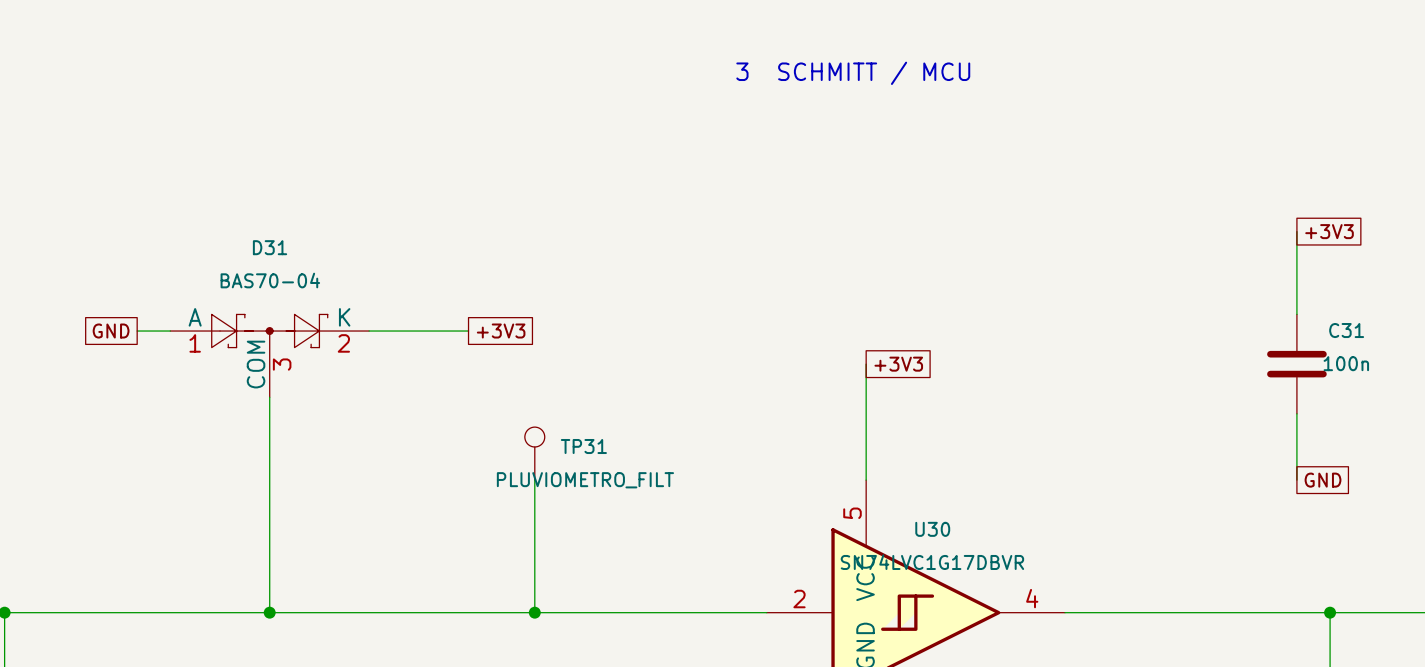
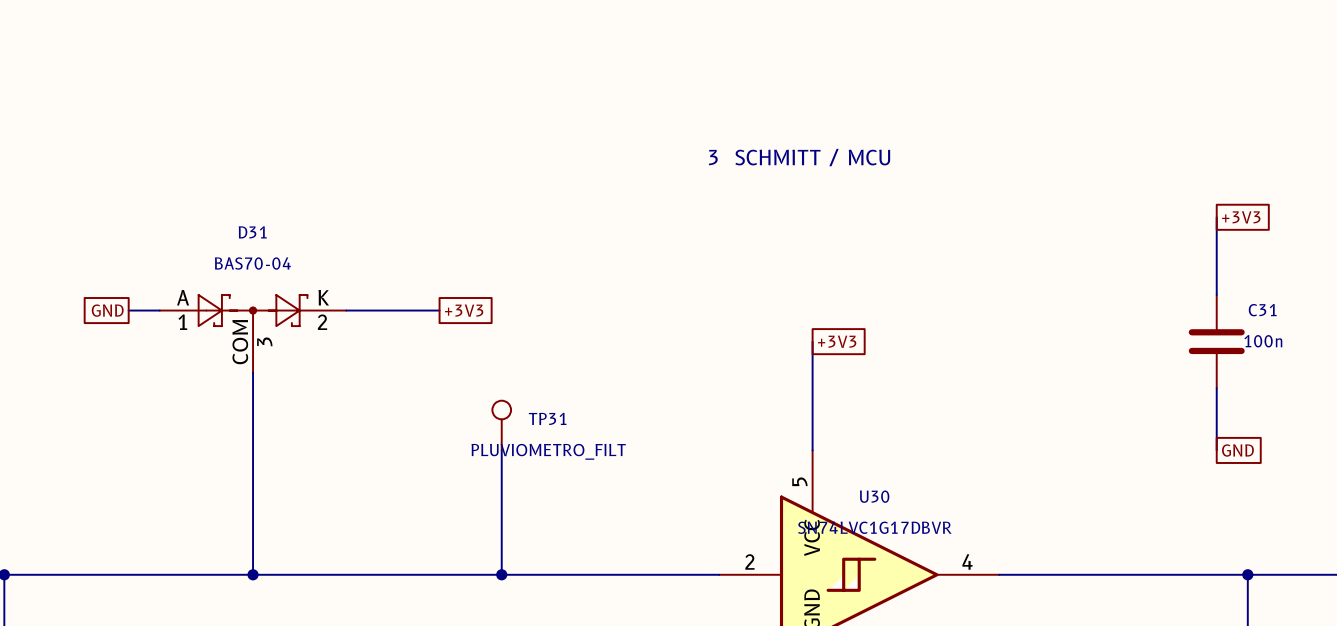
text position: 3 SCHMITT / MCU (853, 73) -> 3 SCHMITT / MCU (799, 157)

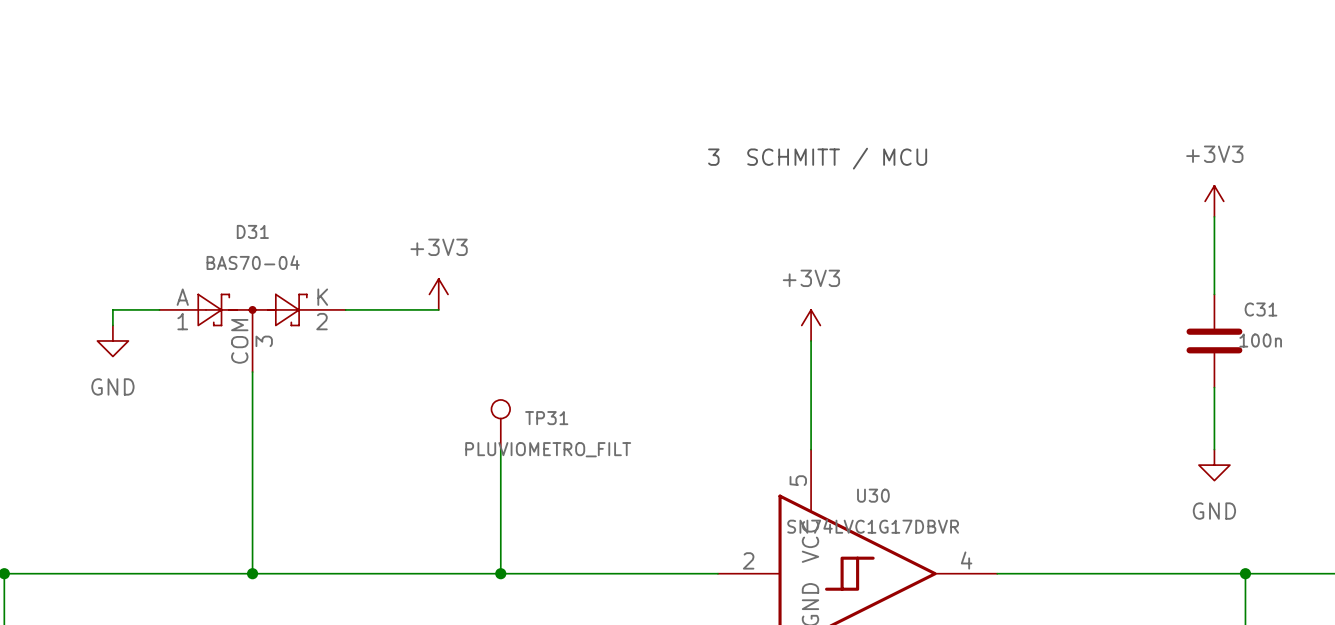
power symbol: none -> +3V3 (1214, 201)
global label: +3V3 (1241, 217) -> none
power symbol: none -> +3V3 (438, 294)
global label: GND (107, 310) -> none
wire: none -> (128, 309) (112, 309) (112, 325)
global label: +3V3 (464, 310) -> none
power symbol: none -> +3V3 (811, 325)
power symbol: none -> GND (112, 340)
global label: +3V3 (837, 341) -> none
global label: GND (1237, 450) -> none
power symbol: none -> GND (1214, 465)

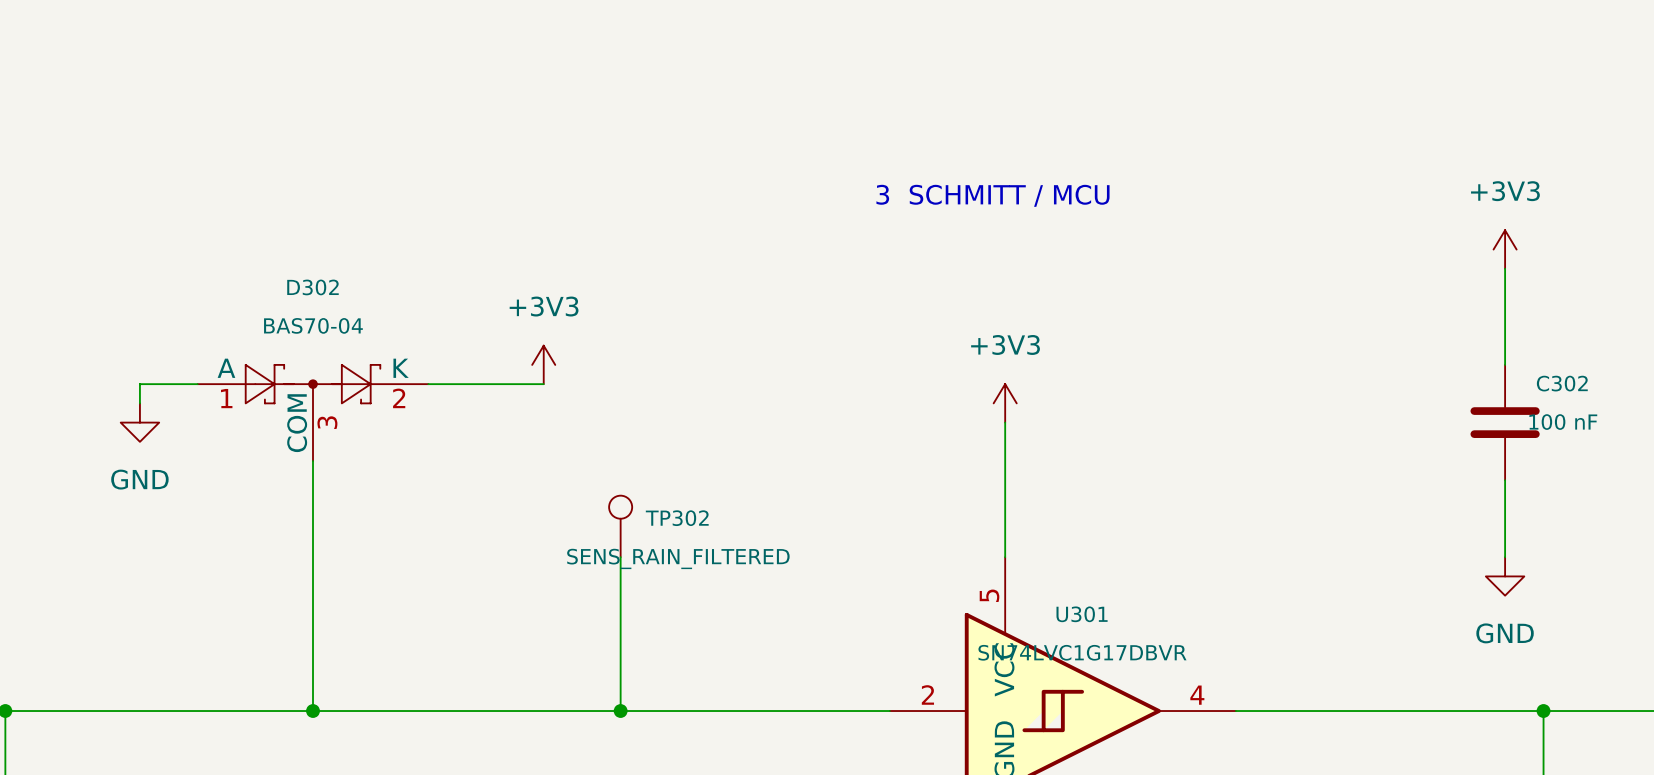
D31 name: D31 (252, 231) -> D302 (312, 287)
C31 name: C31 (1260, 309) -> C302 (1562, 383)
C31 value: 100n (1260, 340) -> 100 nF (1563, 422)
TP31 name: TP31 (546, 418) -> TP302 (677, 518)
TP31 value: PLUVIOMETRO_FILT (548, 449) -> SENS_RAIN_FILTERED (678, 558)
U30 name: U30 (873, 495) -> U301 (1082, 614)

